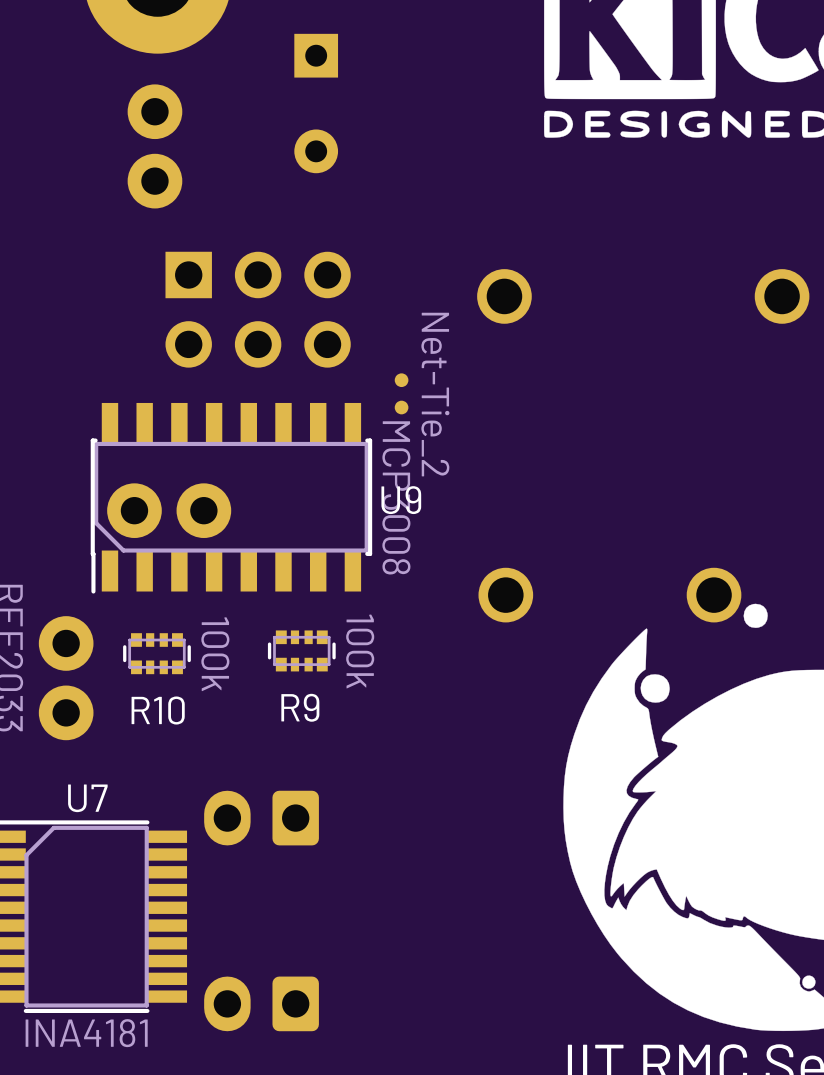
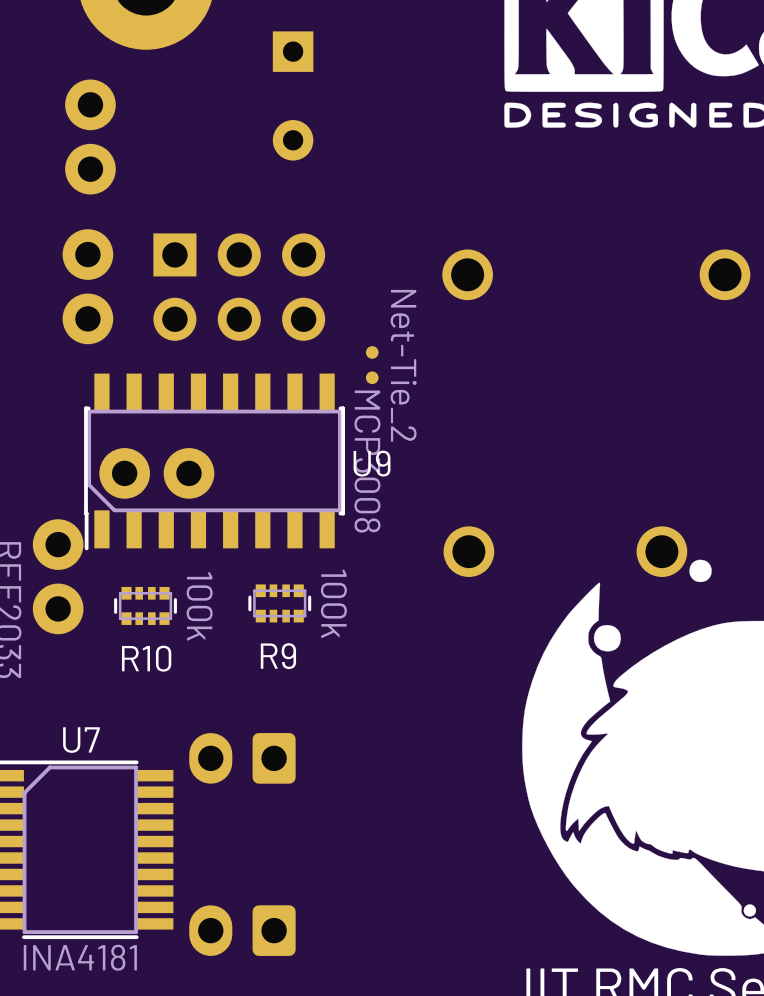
part position: (154, 146) -> (90, 137)
part: none -> (87, 286)
part position: (66, 678) -> (58, 576)

